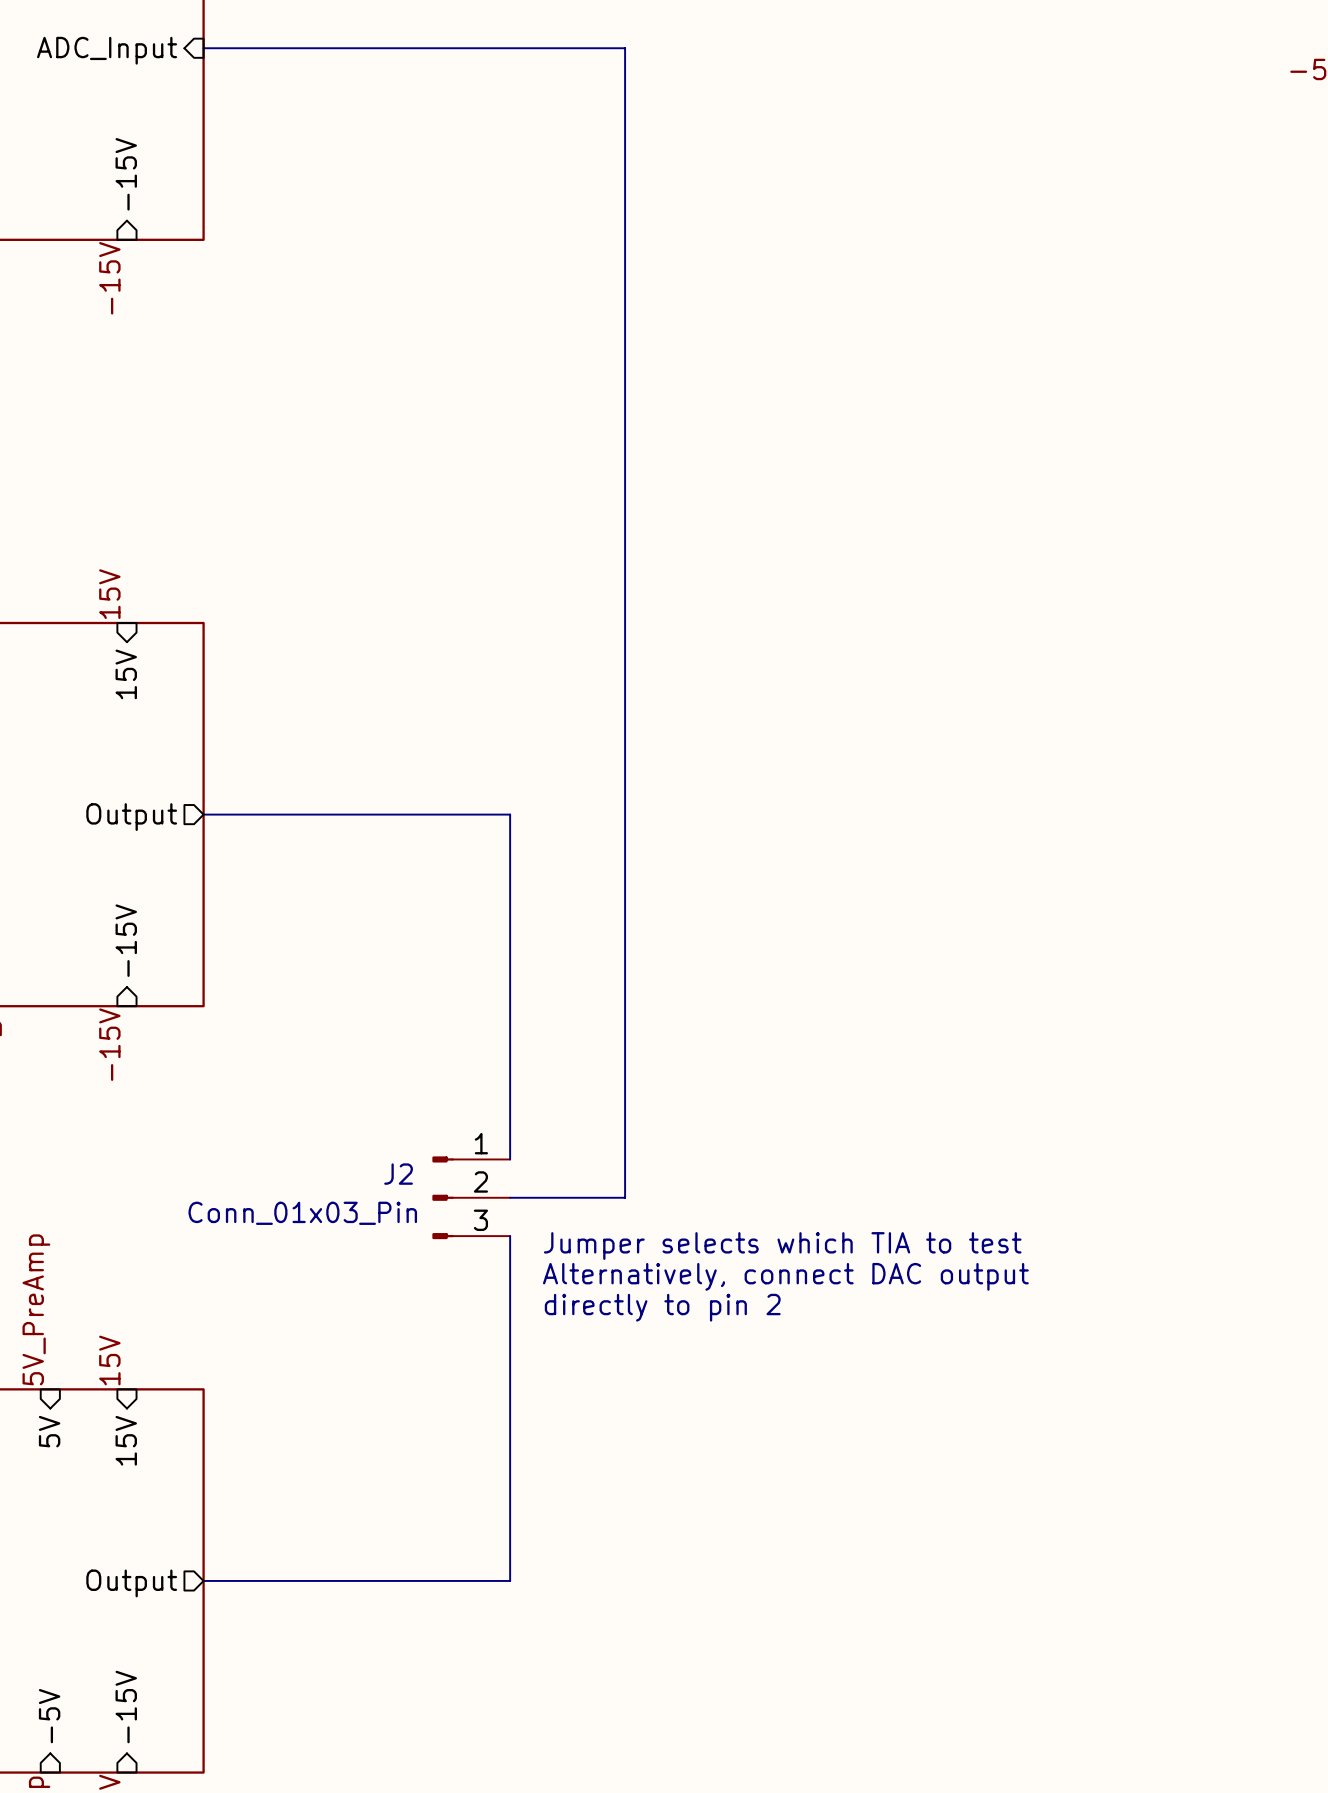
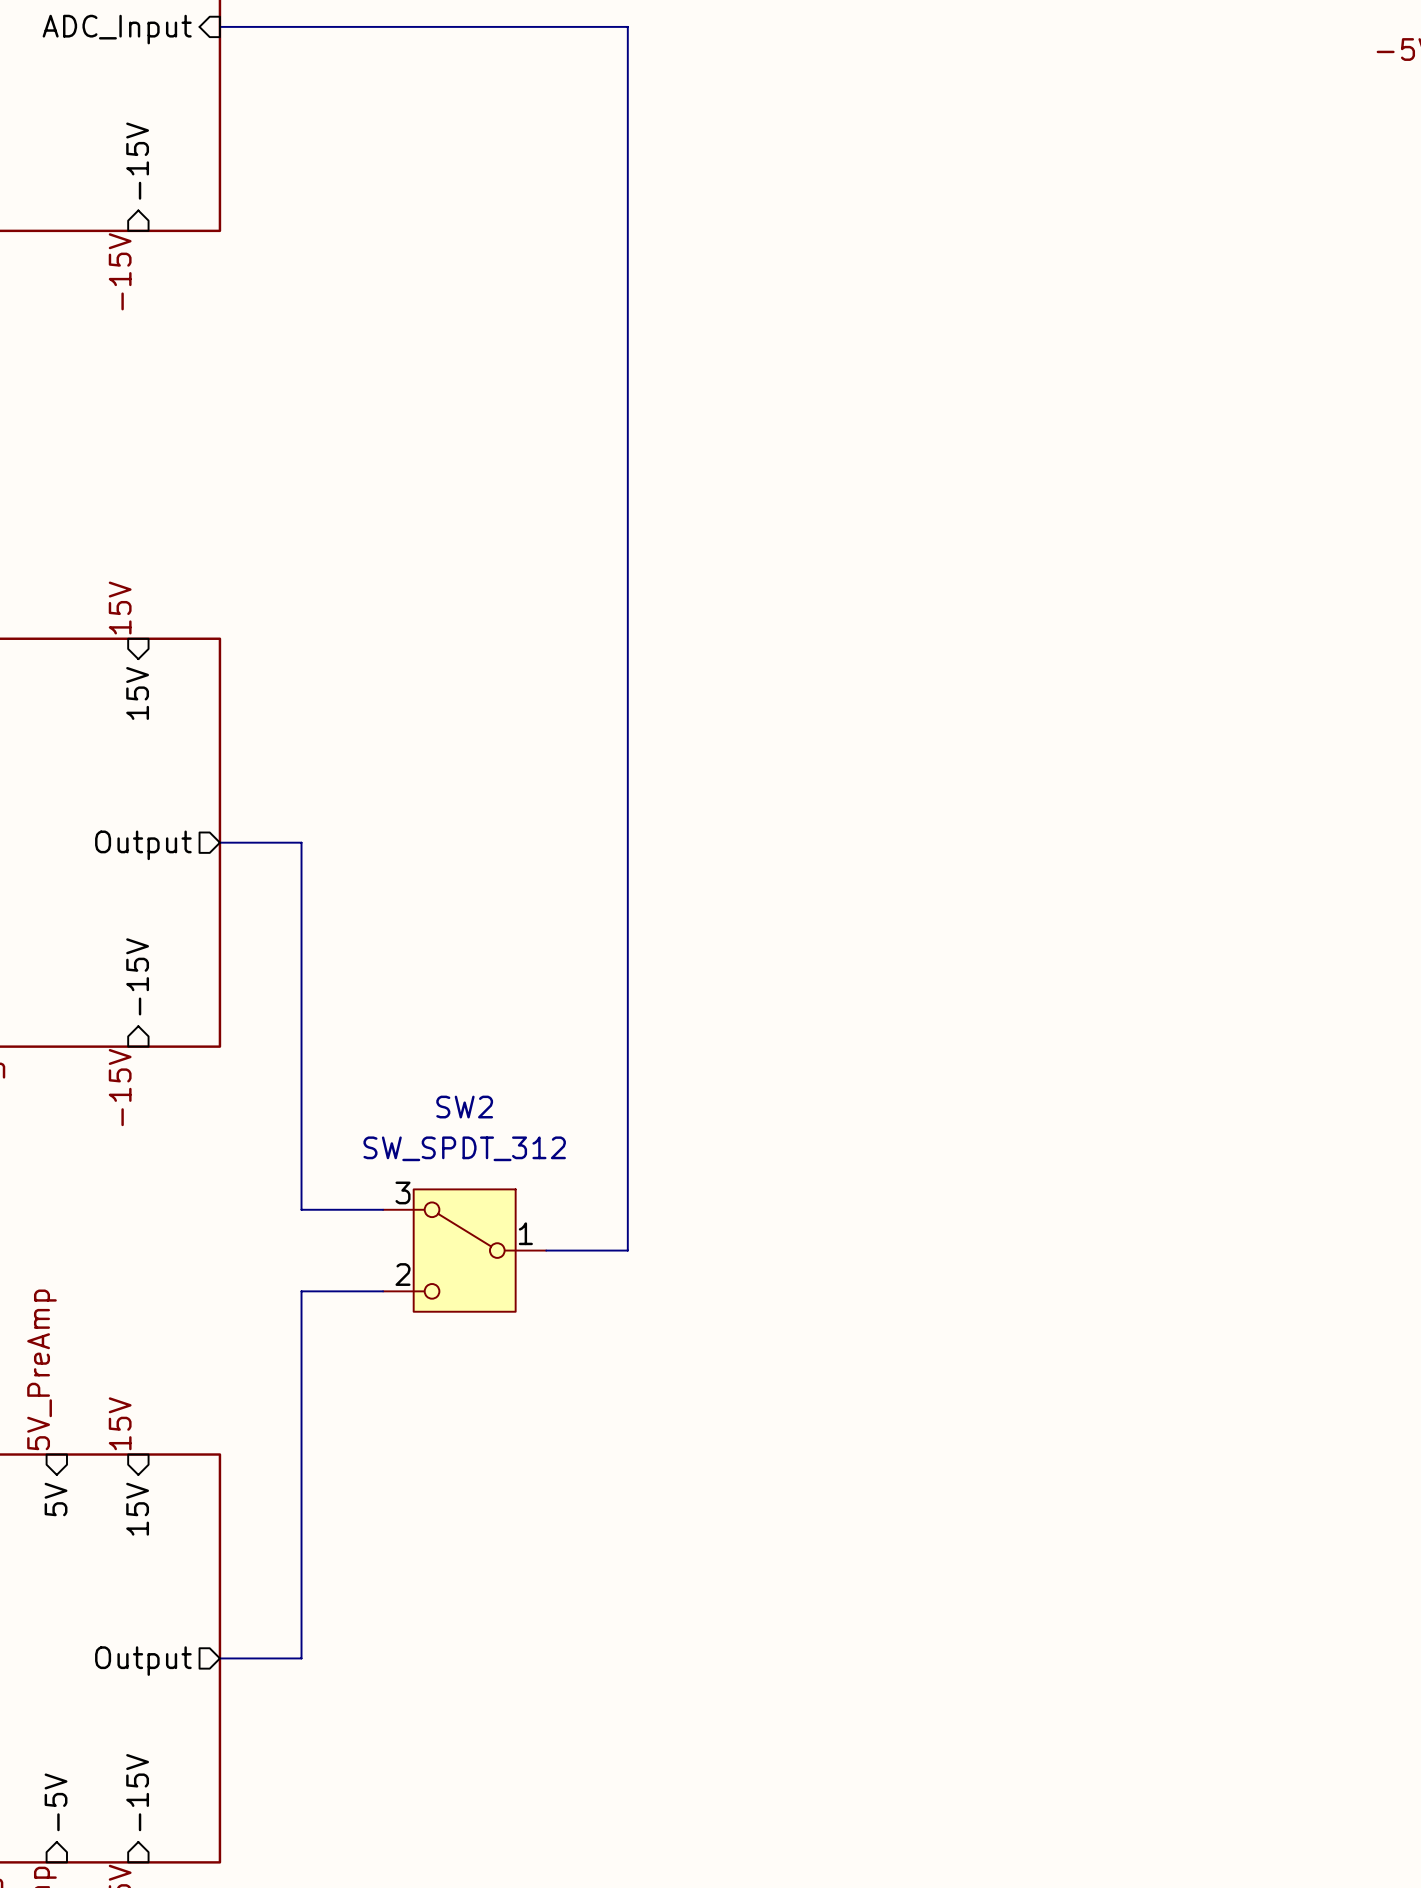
wire: (586, 48) (625, 48) (625, 1197) (586, 1197) -> (627, 26) (627, 1250)
wire: (280, 814) (510, 814) (510, 1159) -> (301, 842) (301, 1209) (383, 1209)
SW2: none -> SW_SPDT_312 (464, 1250)
J2: Conn_01x03_Pin (471, 1197) -> none
wire: (510, 1236) (510, 1580) (280, 1580) -> (383, 1291) (301, 1291) (301, 1658)
text: Jumper selects which TIA to test (782, 1246) -> none
text: Alternatively, connect DAC output (785, 1276) -> none
text: directly to pin 2 (662, 1307) -> none

